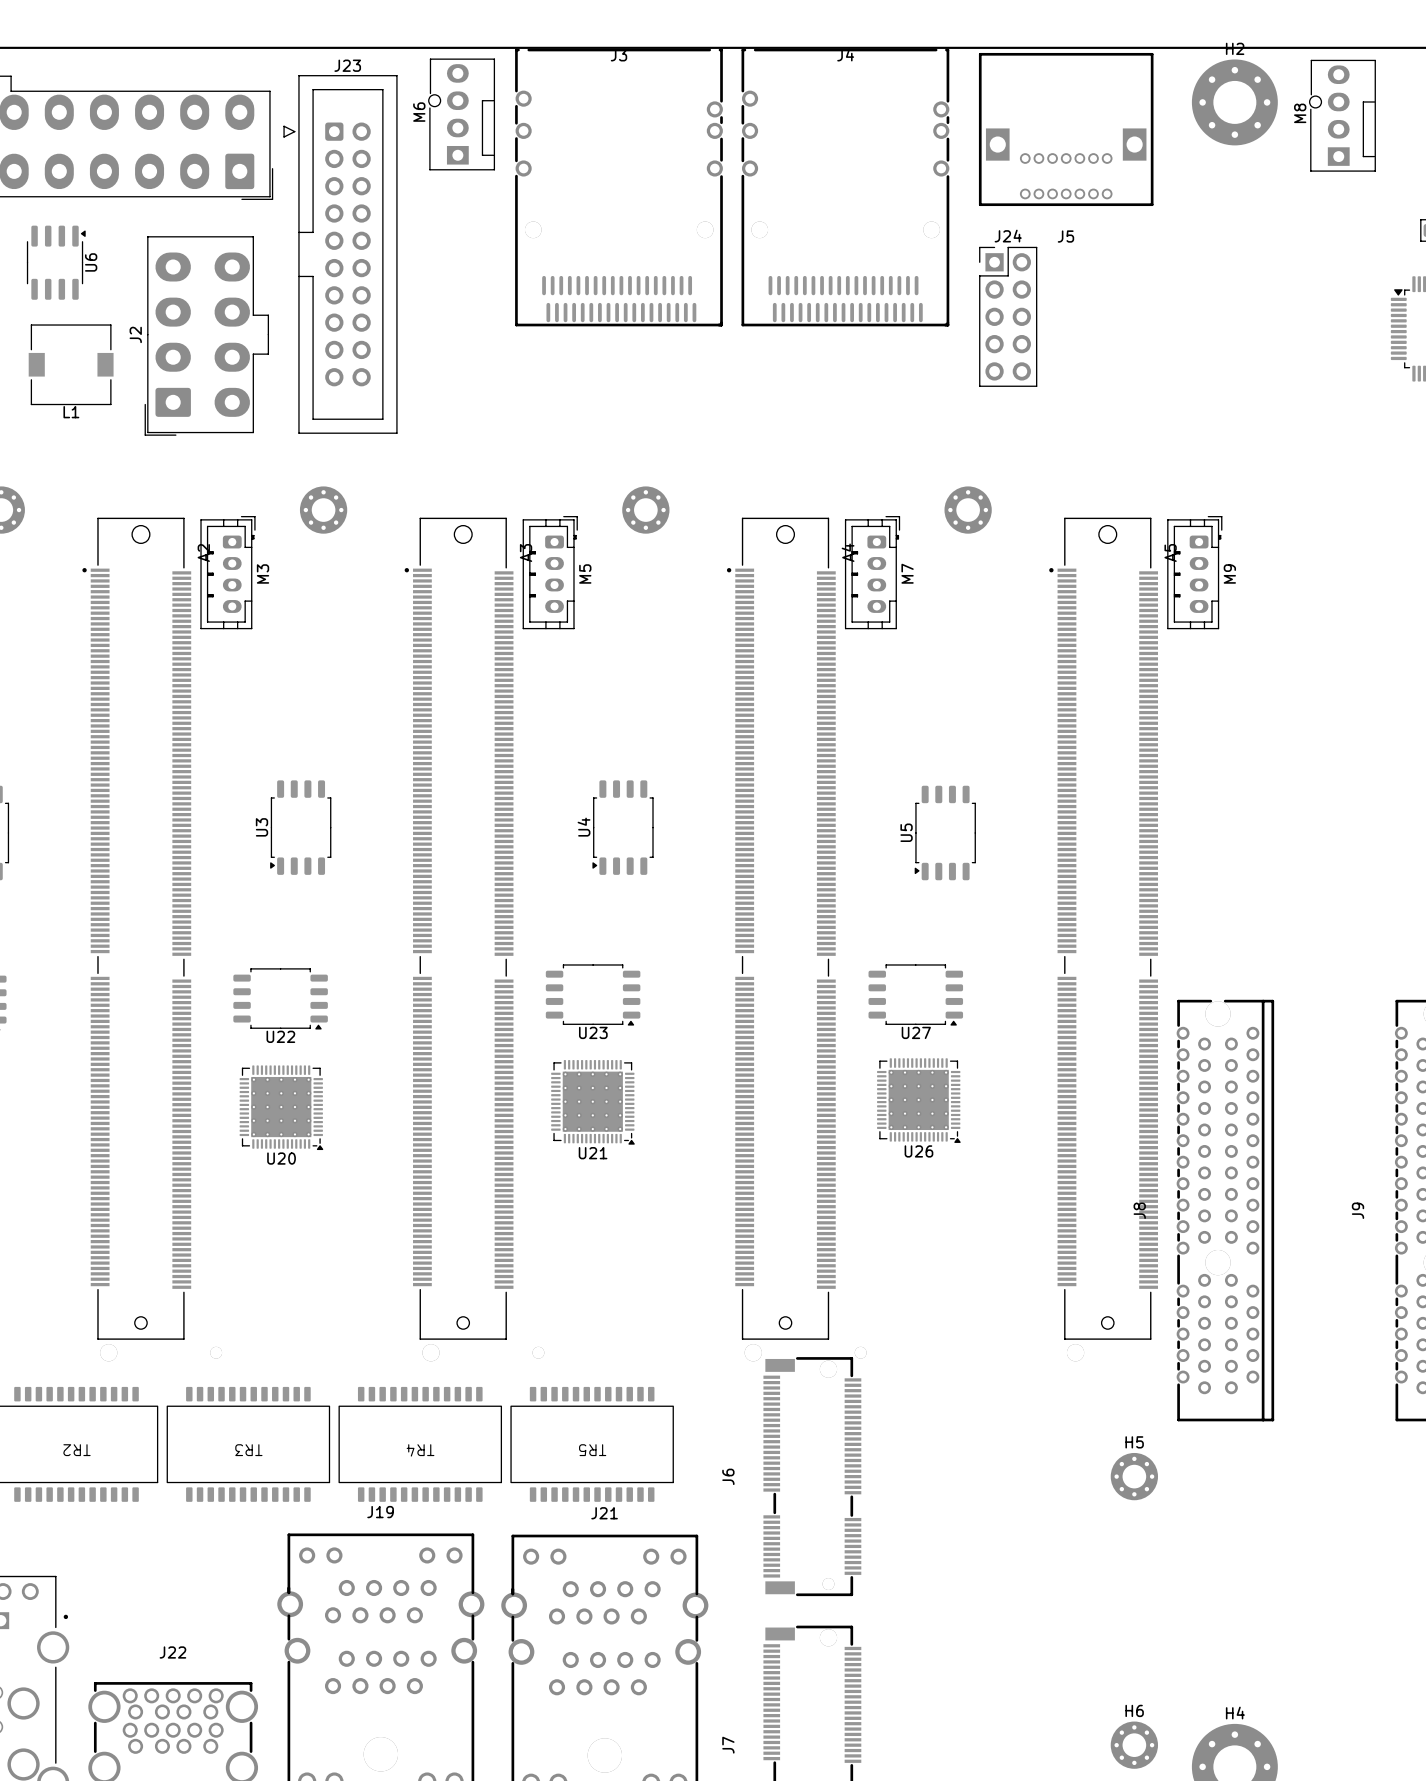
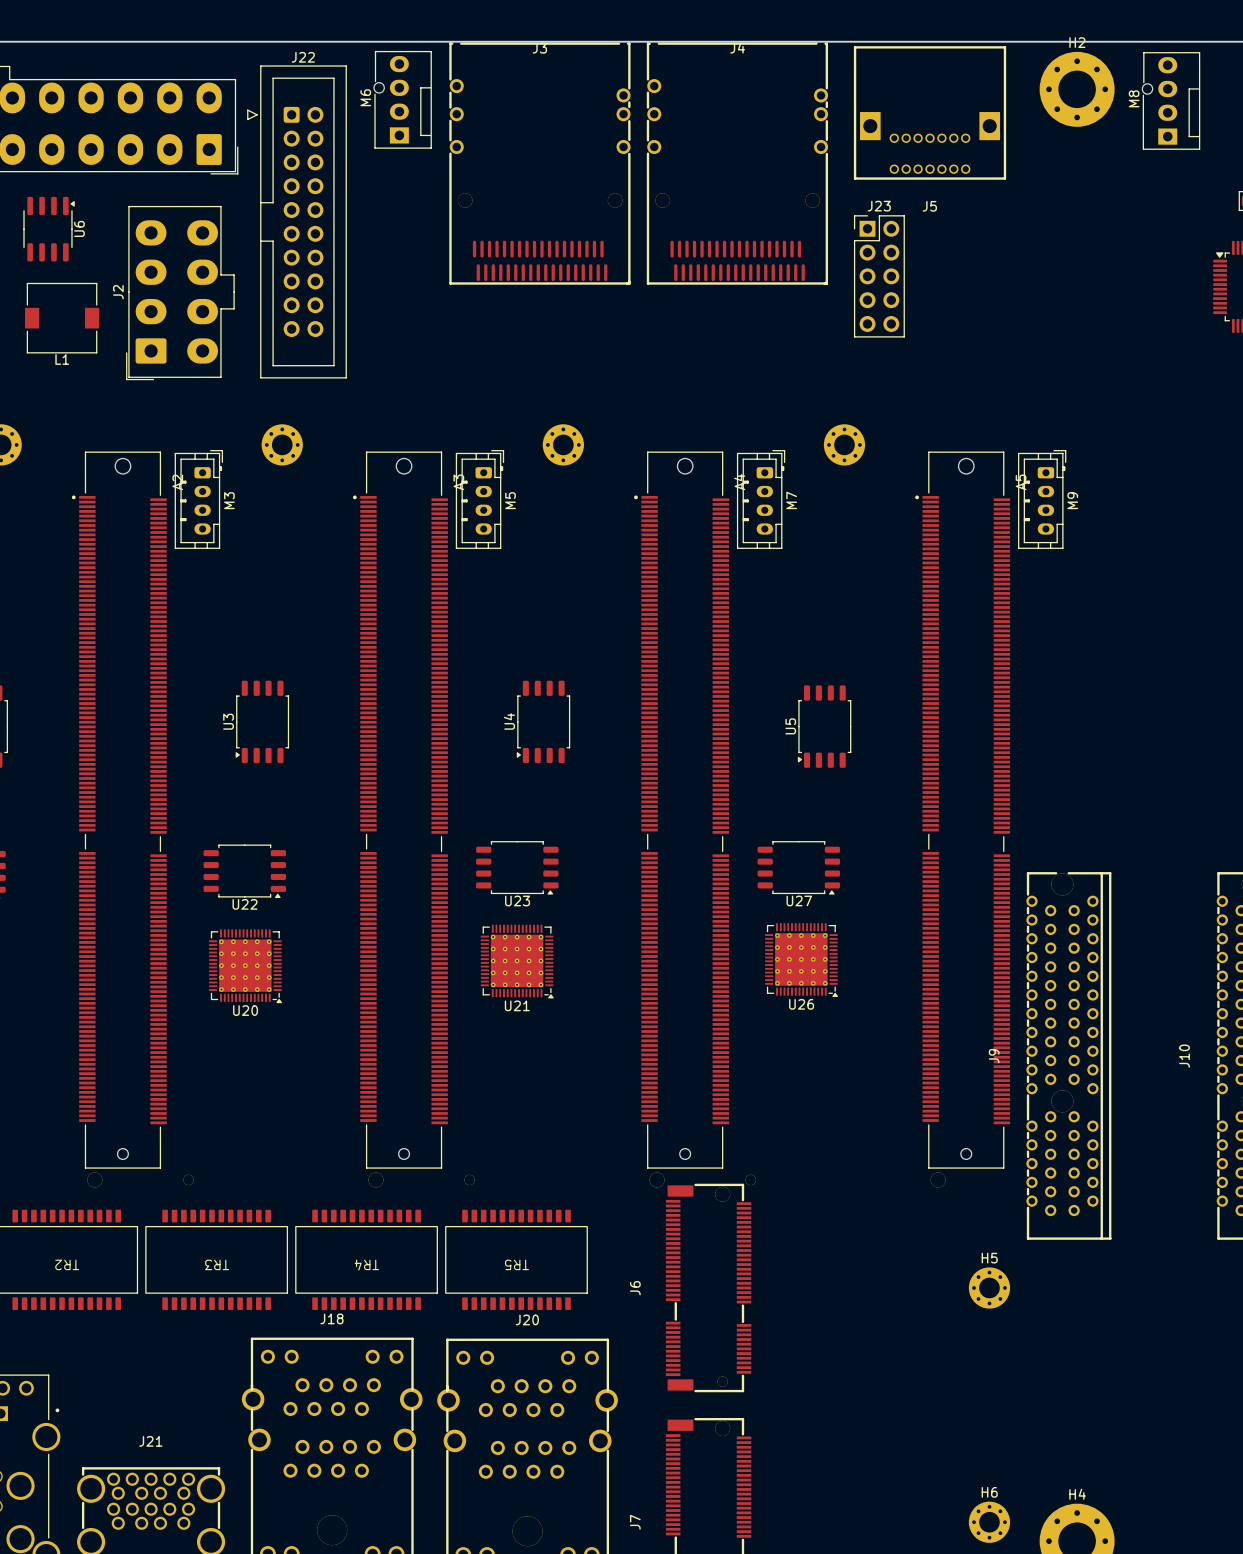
J23 name: J23 (347, 65) -> J22 (303, 57)
J24 name: J24 (1008, 236) -> J23 (879, 206)
J8 name: J8 (1139, 1210) -> J9 (994, 1056)
J9 name: J9 (1358, 1210) -> J10 (1184, 1056)
J19 name: J19 (380, 1512) -> J18 (331, 1318)
J21 name: J21 (604, 1513) -> J20 (527, 1319)
J22 name: J22 (172, 1652) -> J21 (150, 1441)

